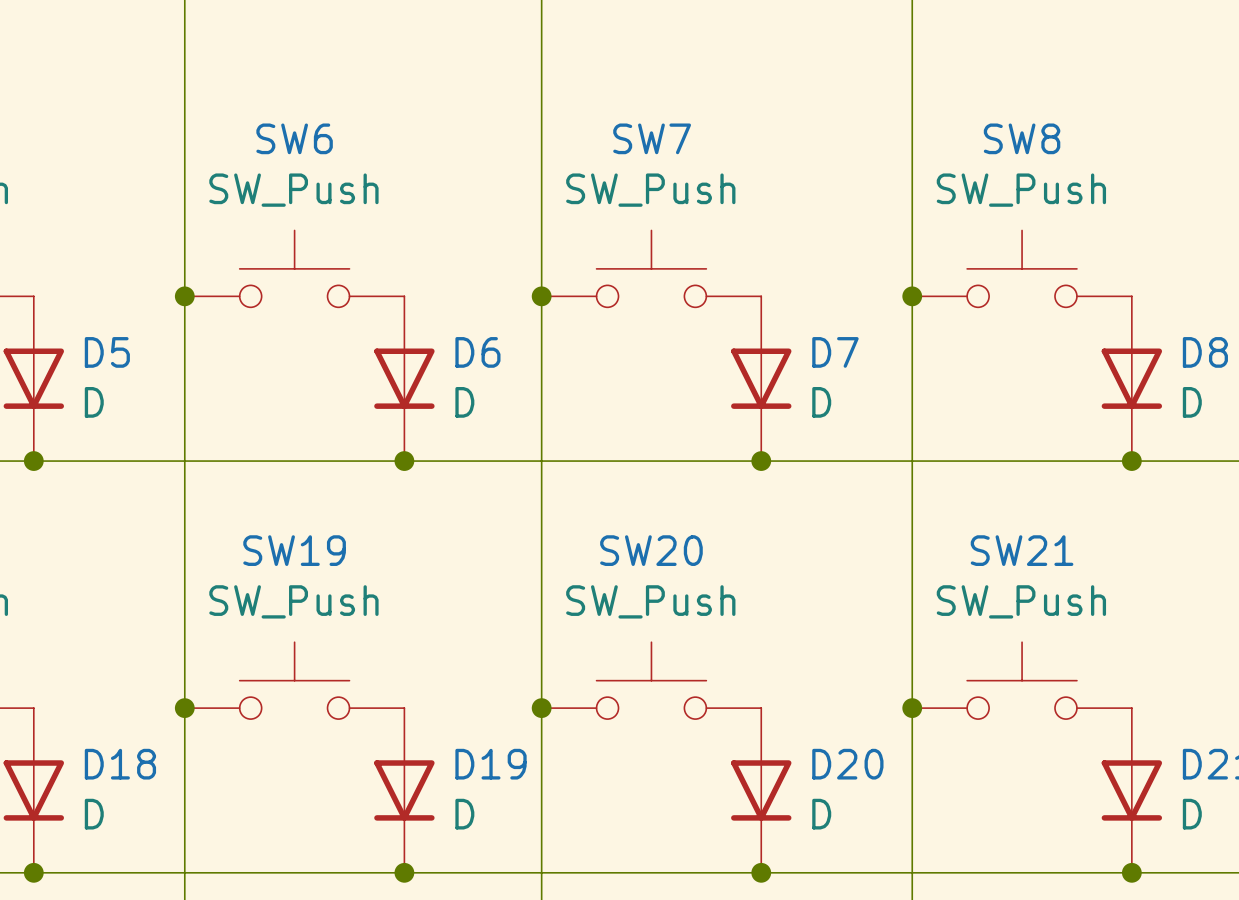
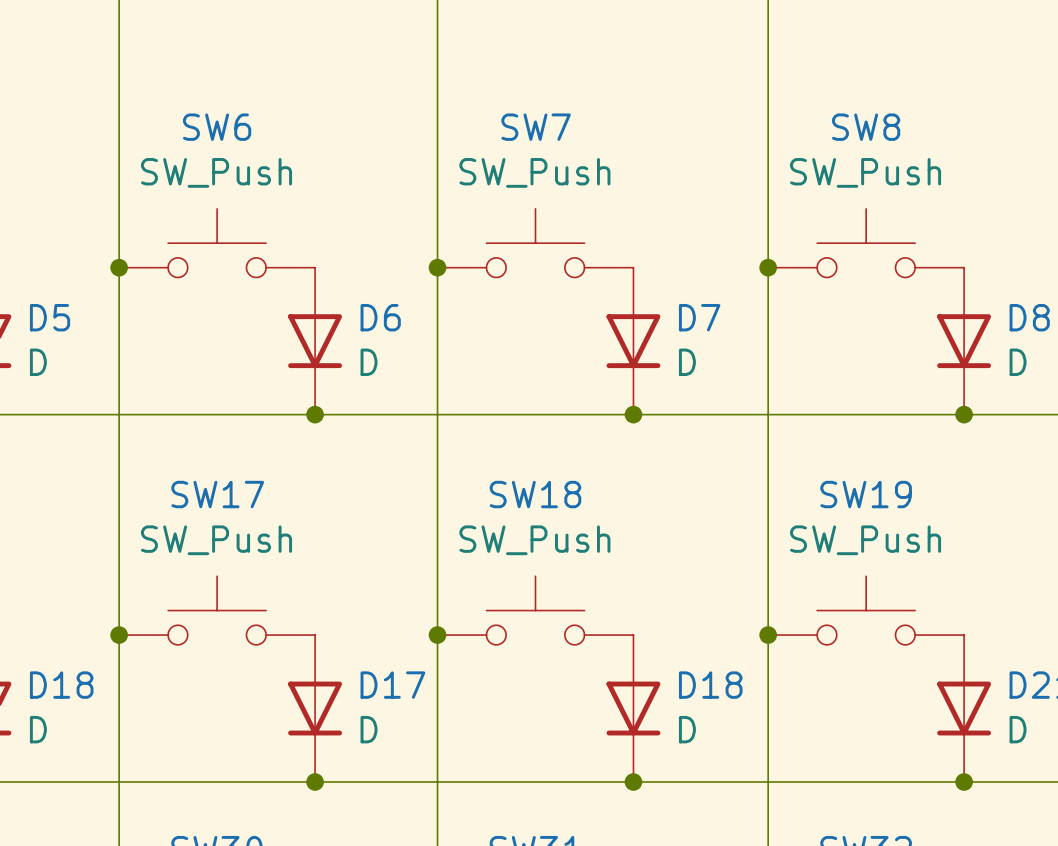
SW19 name: SW19 (294, 550) -> SW17 (217, 494)
SW20 name: SW20 (651, 550) -> SW18 (535, 494)
SW21 name: SW21 (1022, 550) -> SW19 (866, 494)
D19 name: D19 (491, 764) -> D17 (392, 685)
D20 name: D20 (847, 764) -> D18 (710, 685)

